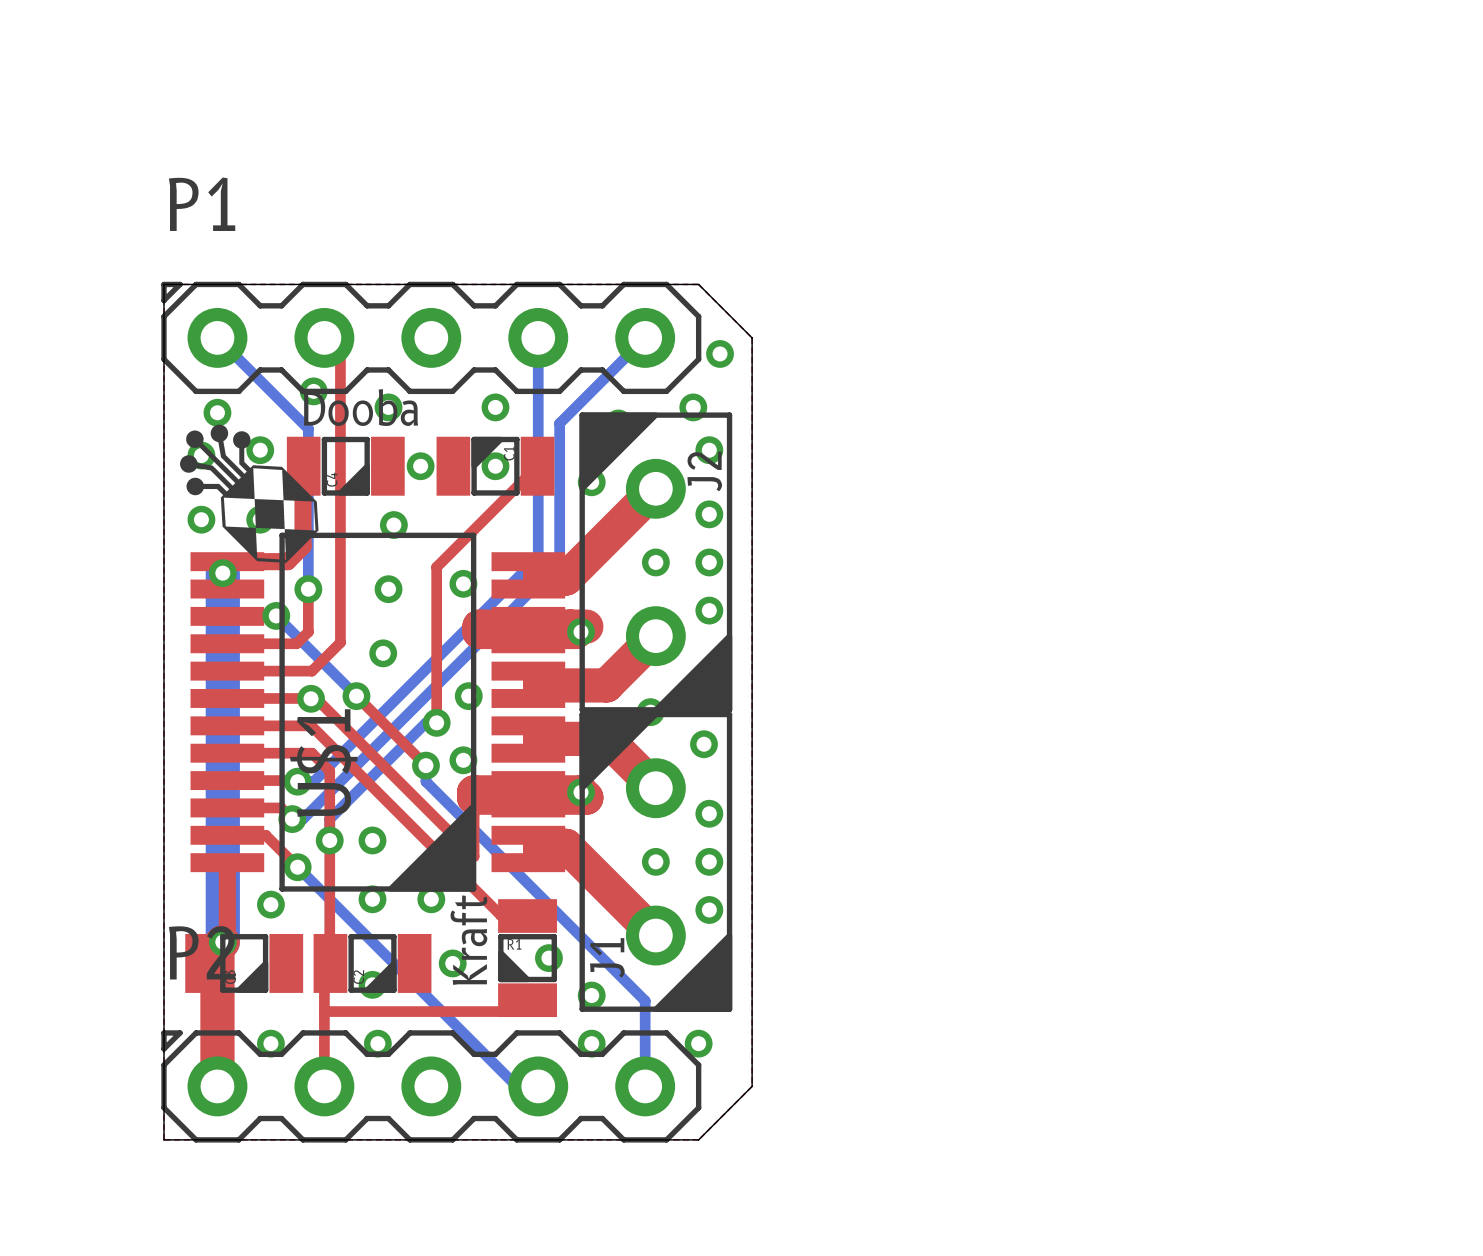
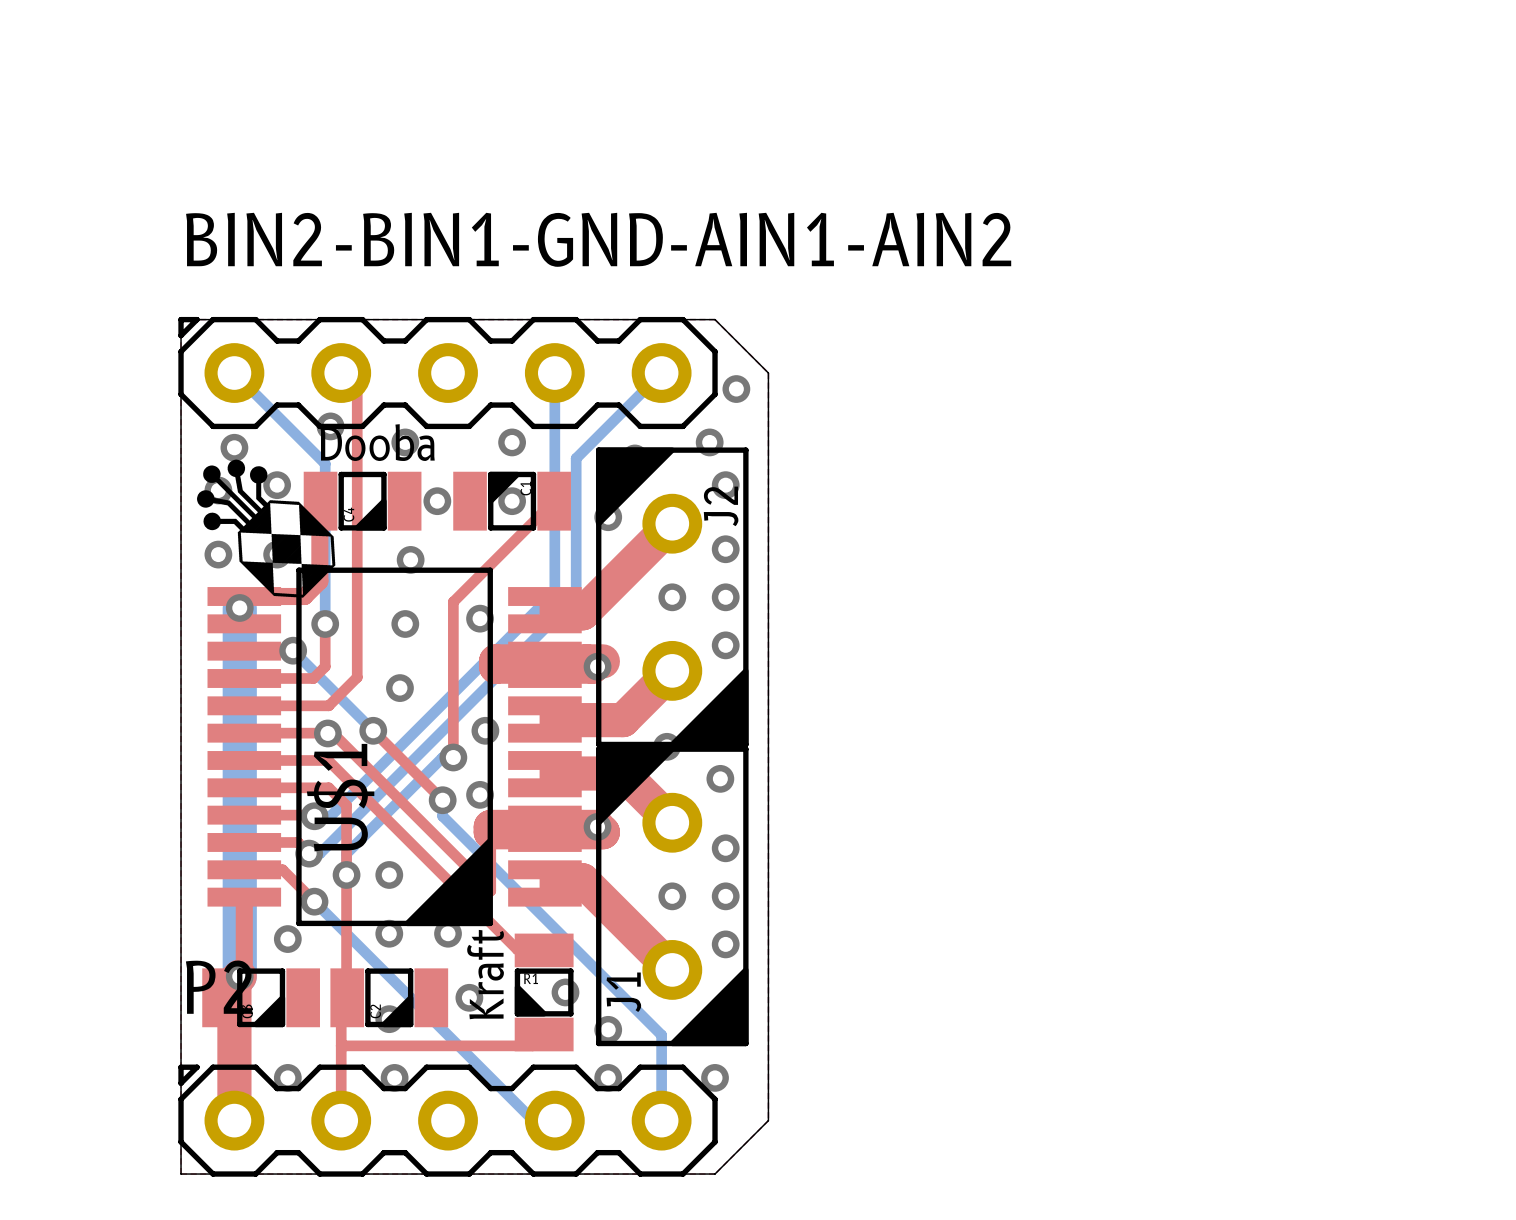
P1 name: P1 (202, 204) -> BIN2-BIN1-GND-AIN1-AIN2 (598, 239)

